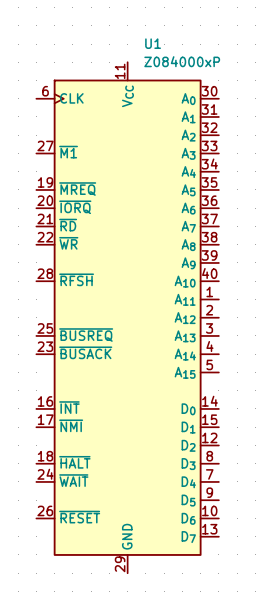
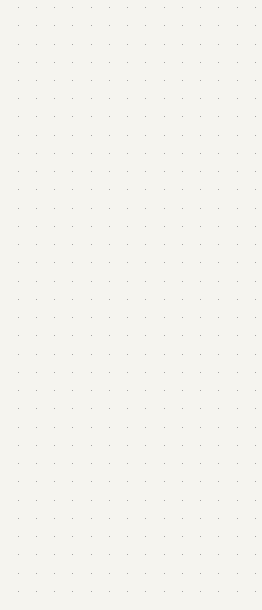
U1: Z084000xP (127, 317) -> none

